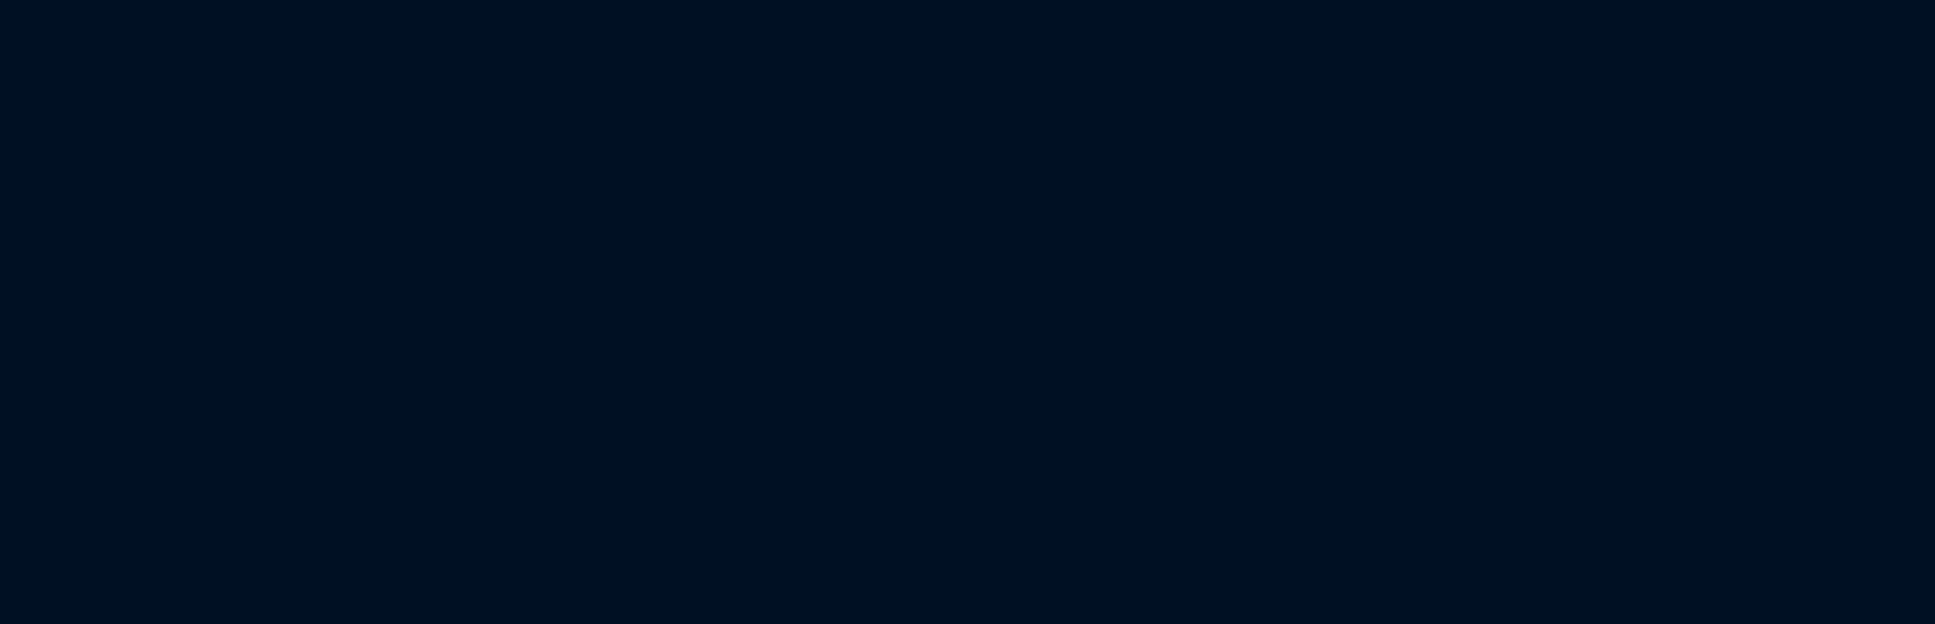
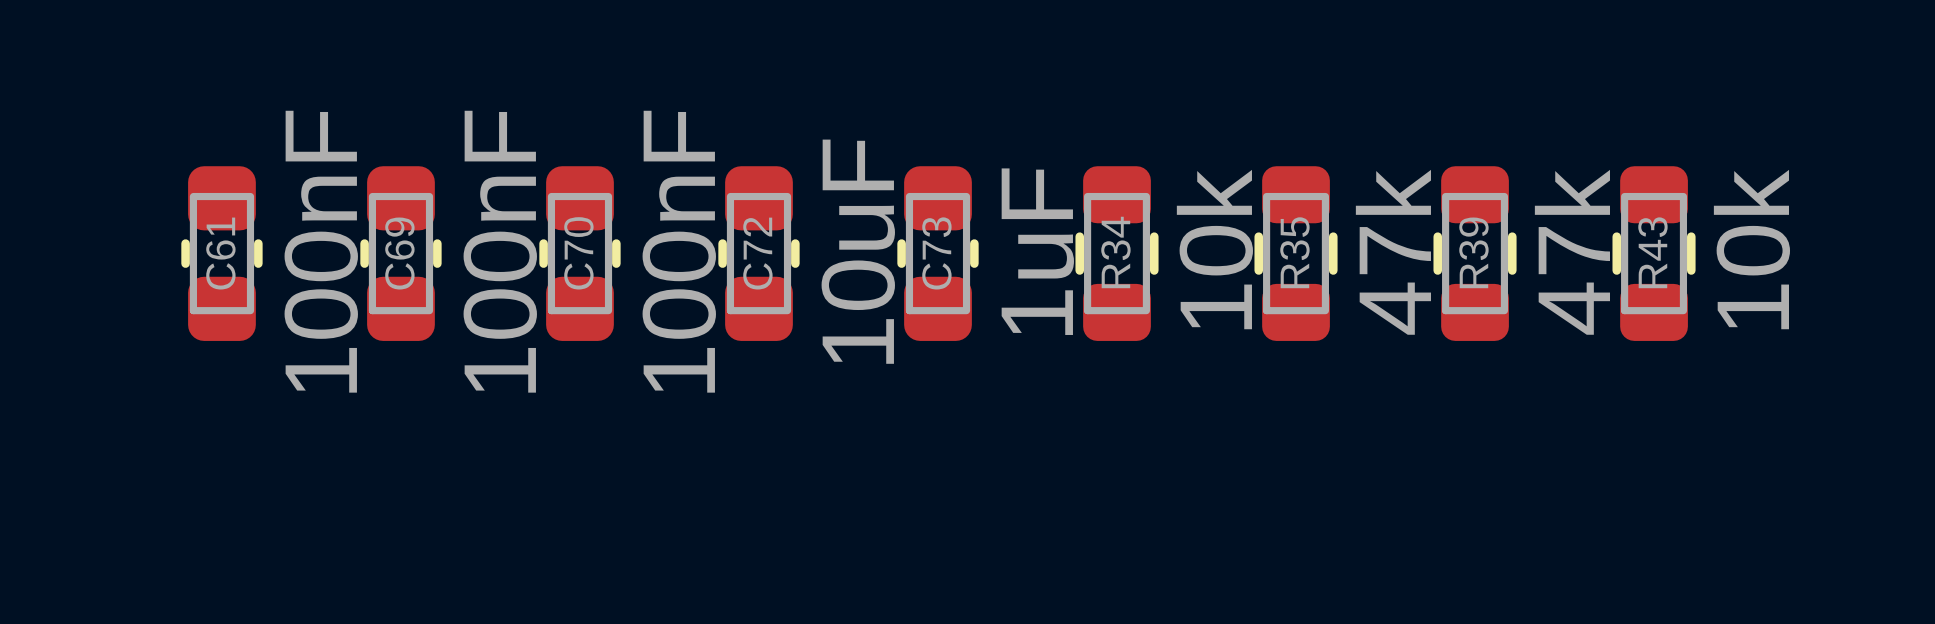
C61: none -> 100nF (221, 253)
C69: none -> 100nF (400, 253)
C70: none -> 100nF (579, 253)
C72: none -> 10uF (758, 253)
C73: none -> 1uF (938, 253)
R34: none -> 10k (1117, 253)
R35: none -> 47k (1296, 253)
R39: none -> 47k (1475, 253)
R43: none -> 10k (1654, 253)

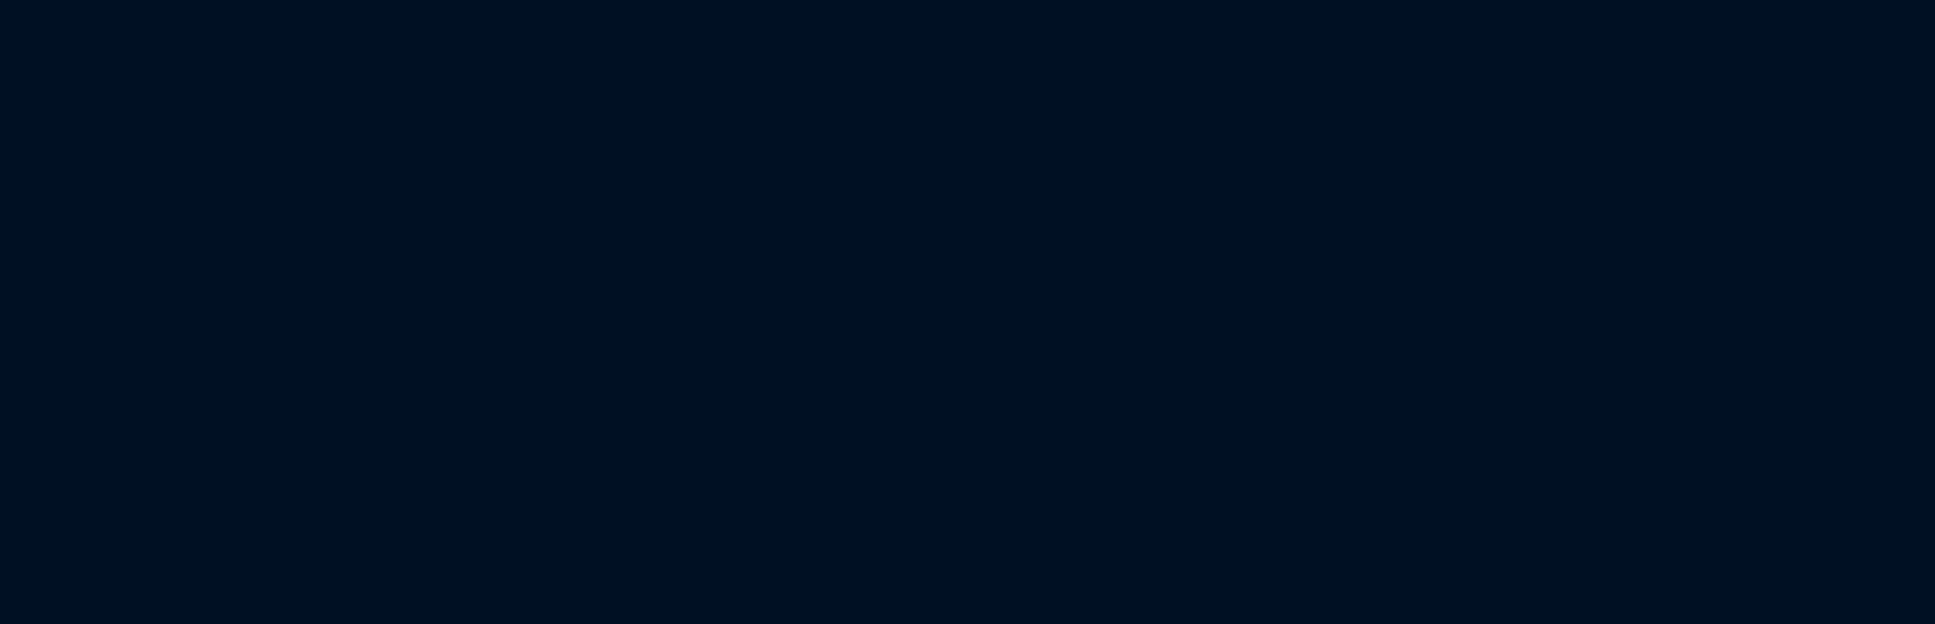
C61: 100nF (221, 253) -> none
C69: 100nF (400, 253) -> none
C70: 100nF (579, 253) -> none
C72: 10uF (758, 253) -> none
C73: 1uF (938, 253) -> none
R34: 10k (1117, 253) -> none
R35: 47k (1296, 253) -> none
R39: 47k (1475, 253) -> none
R43: 10k (1654, 253) -> none

